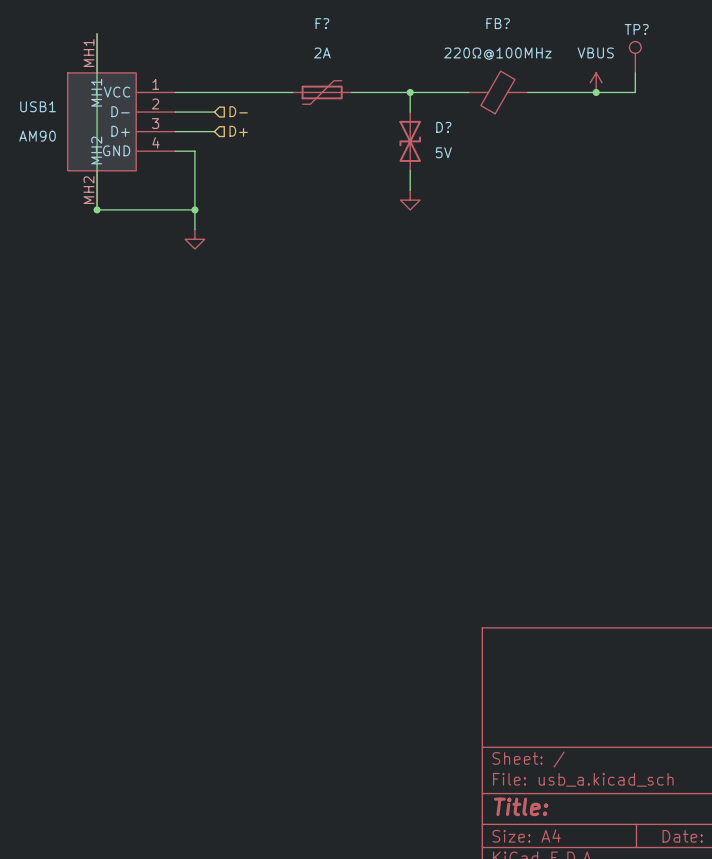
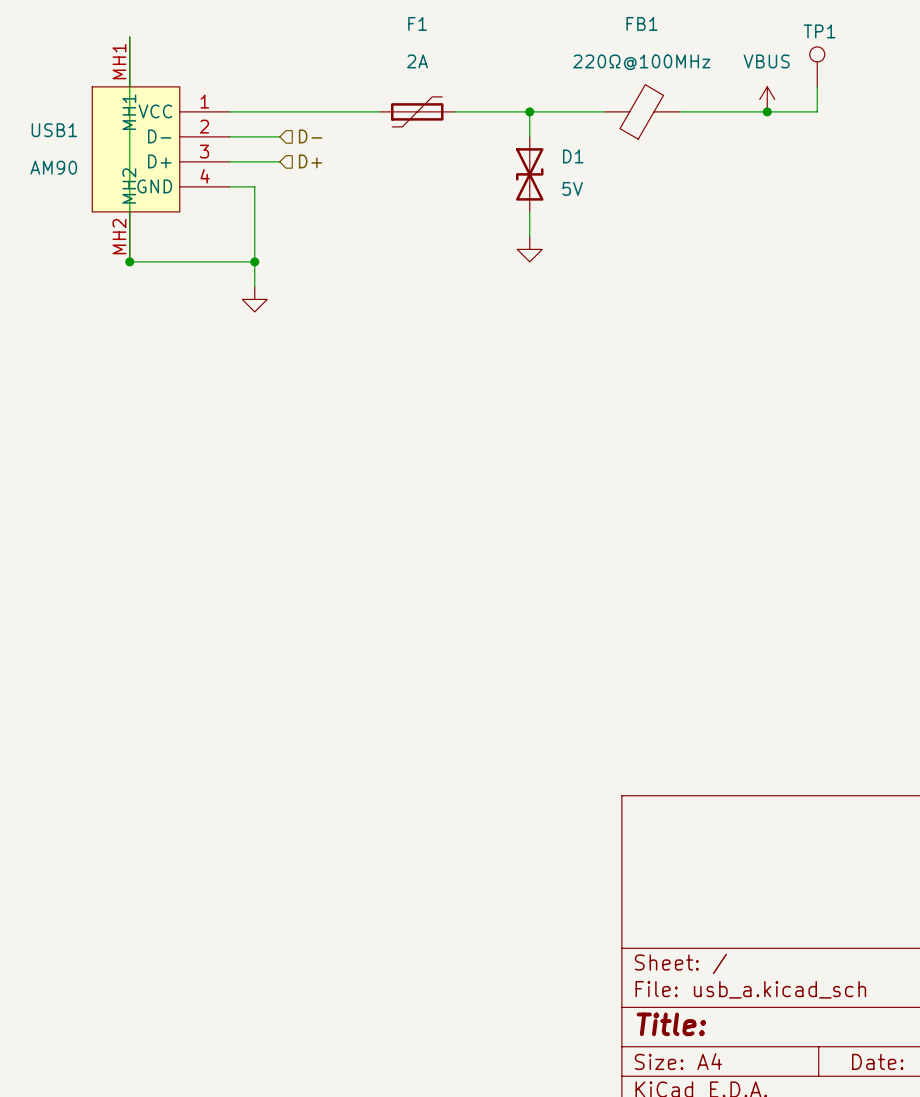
F? name: F? (322, 23) -> F1 (417, 23)
FB? name: FB? (498, 23) -> FB1 (642, 23)
TP? name: TP? (636, 29) -> TP1 (819, 31)
D? name: D? (443, 127) -> D1 (573, 156)

